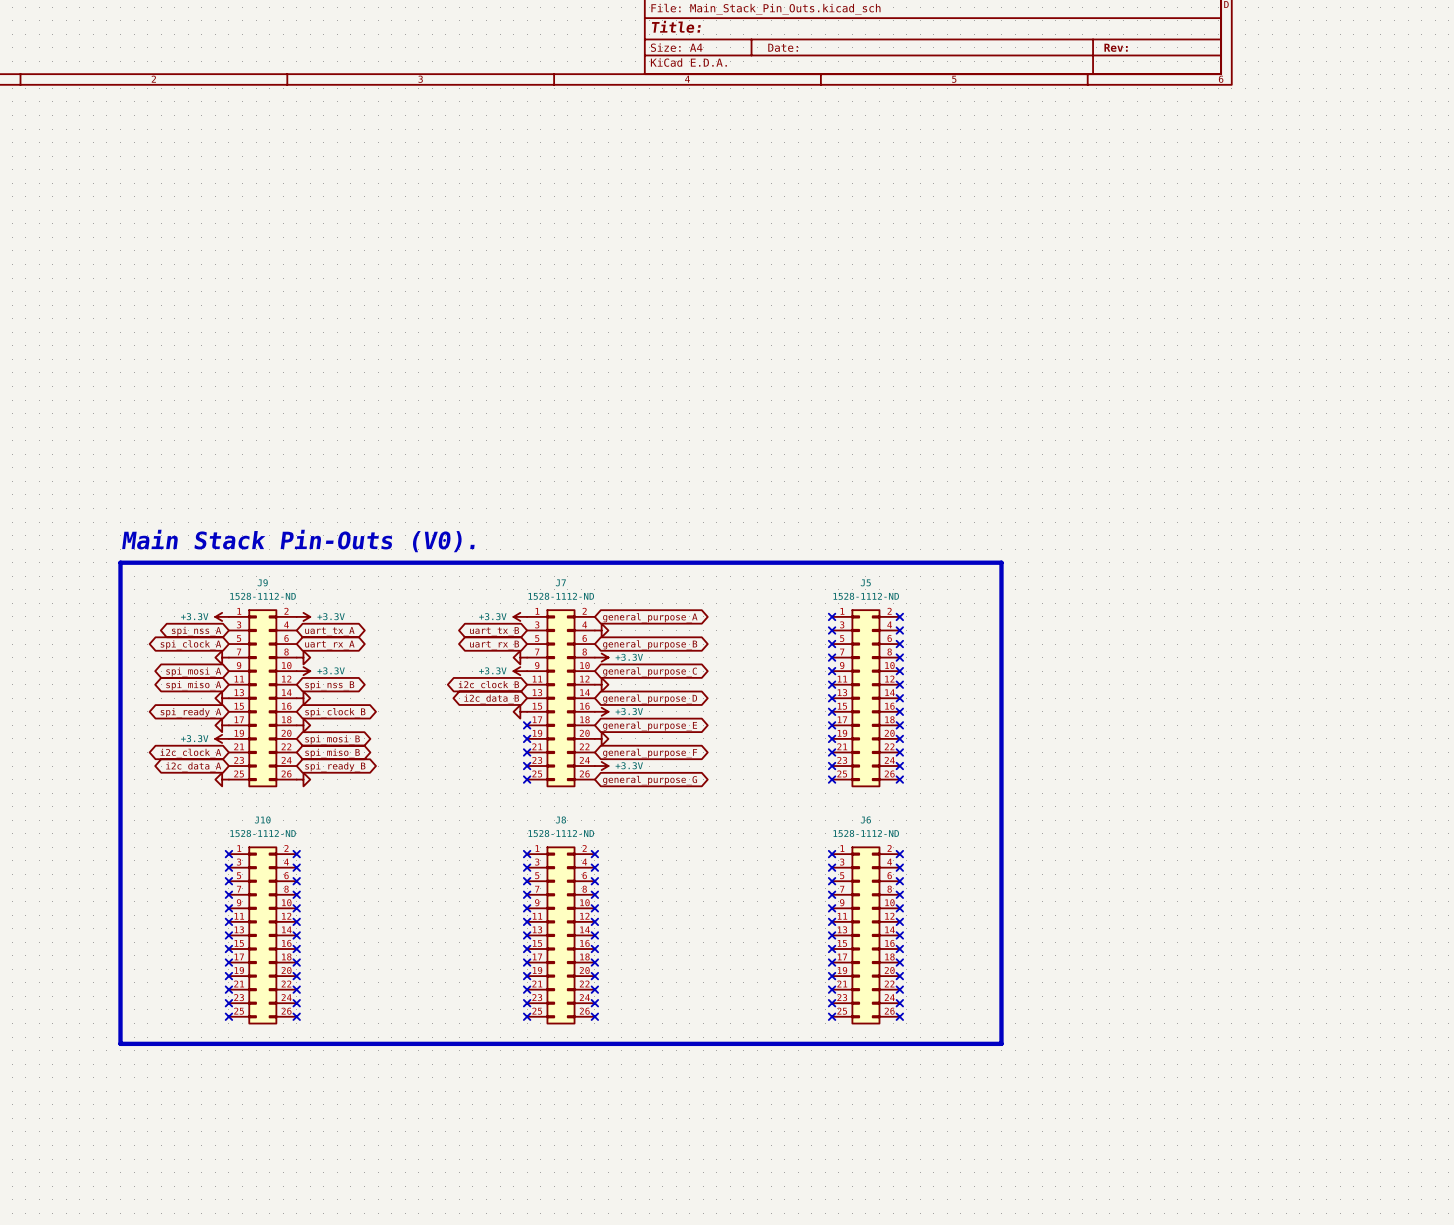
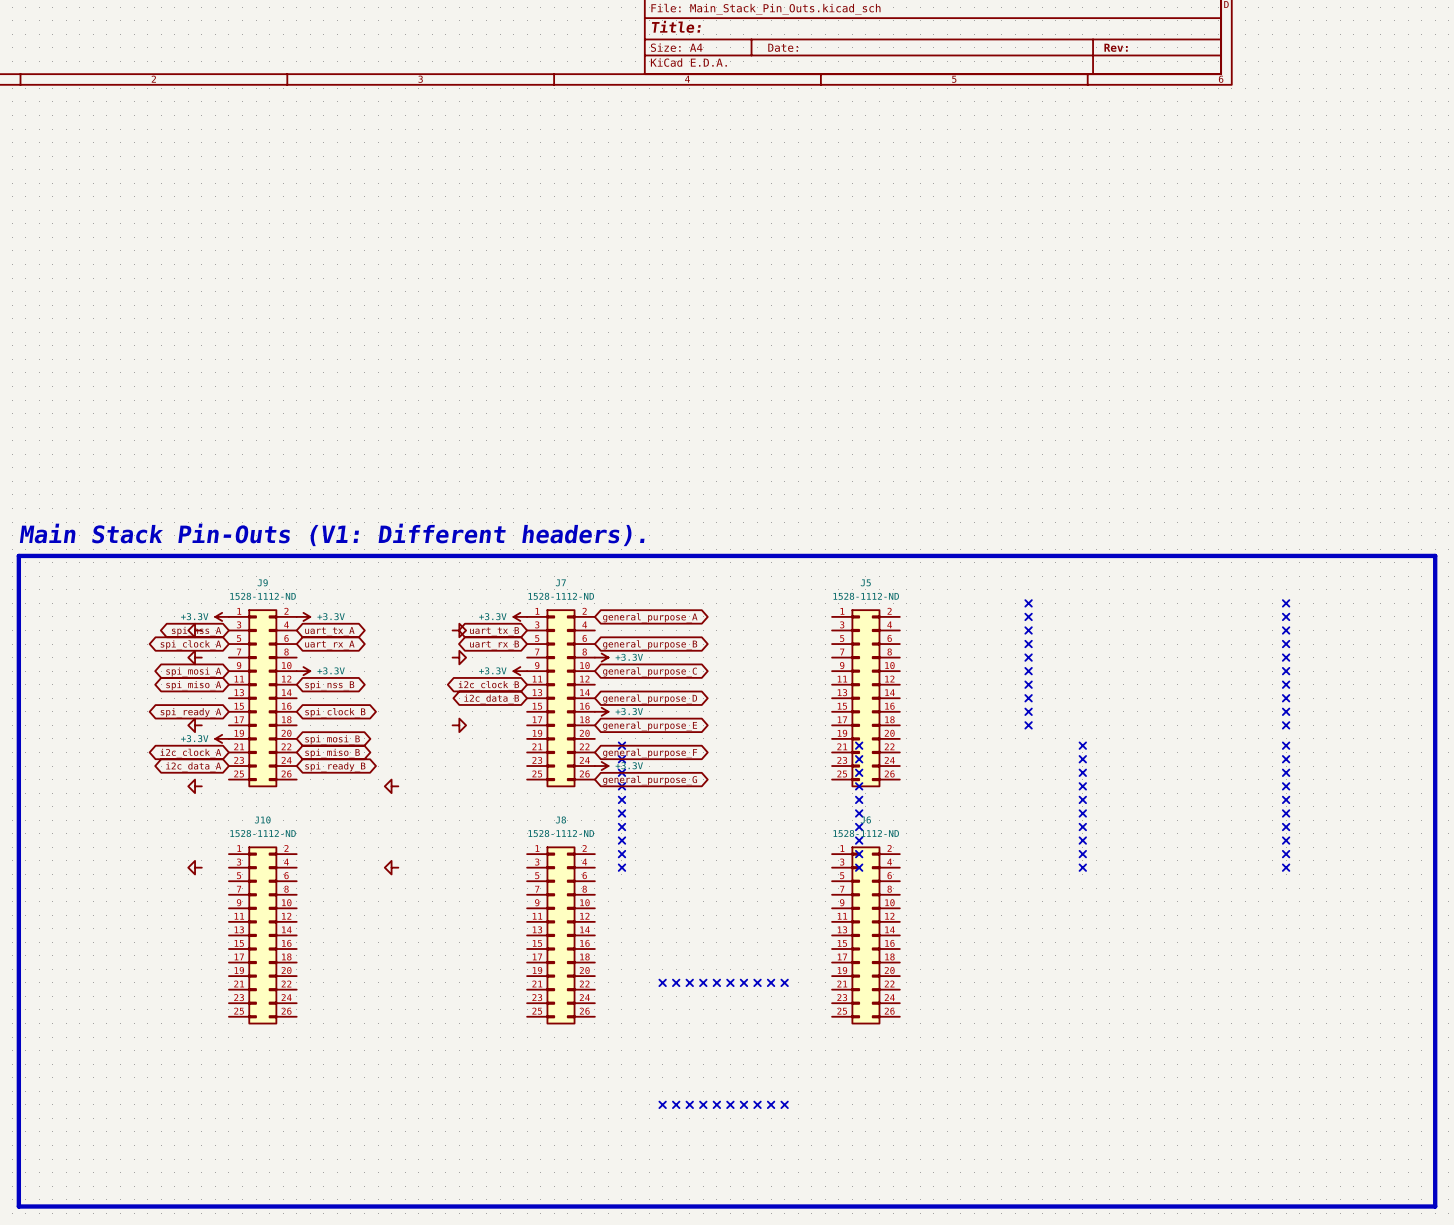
text: Main Stack Pin-Outs (V0). (298, 540) -> Main Stack Pin-Outs (V1: Different headers). (332, 534)
line: none -> (18, 555) (1435, 555) (1435, 1206) (18, 1206) (18, 555)
line: (120, 562) (1001, 562) (1001, 1043) (120, 1043) (120, 562) -> none
no-connect mark: none -> (1028, 603)
no-connect mark: none -> (1286, 603)
no-connect mark: (832, 616) -> none
no-connect mark: (899, 616) -> none
no-connect mark: none -> (1028, 616)
no-connect mark: none -> (1286, 616)
power symbol: none -> (195, 630)
power symbol: none -> (459, 630)
power symbol: (601, 630) -> none
no-connect mark: (832, 630) -> none
no-connect mark: (899, 630) -> none
no-connect mark: none -> (1028, 630)
no-connect mark: none -> (1286, 630)
no-connect mark: (832, 644) -> none
no-connect mark: (899, 644) -> none
no-connect mark: none -> (1028, 644)
no-connect mark: none -> (1286, 644)
power symbol: none -> (195, 657)
power symbol: (222, 657) -> none
power symbol: (303, 657) -> none
power symbol: none -> (459, 657)
power symbol: (520, 657) -> none
no-connect mark: (832, 657) -> none
no-connect mark: (899, 657) -> none
no-connect mark: none -> (1028, 657)
no-connect mark: none -> (1286, 657)
no-connect mark: (832, 671) -> none
no-connect mark: (899, 671) -> none
no-connect mark: none -> (1028, 671)
no-connect mark: none -> (1286, 671)
power symbol: (601, 684) -> none
no-connect mark: (832, 684) -> none
no-connect mark: (899, 684) -> none
no-connect mark: none -> (1028, 684)
no-connect mark: none -> (1286, 684)
power symbol: (222, 698) -> none
power symbol: (303, 698) -> none
no-connect mark: (832, 698) -> none
no-connect mark: (899, 698) -> none
no-connect mark: none -> (1028, 698)
no-connect mark: none -> (1286, 698)
power symbol: (520, 711) -> none
no-connect mark: (832, 711) -> none
no-connect mark: (899, 711) -> none
no-connect mark: none -> (1028, 711)
no-connect mark: none -> (1286, 711)
power symbol: none -> (195, 725)
power symbol: (222, 725) -> none
power symbol: (303, 725) -> none
power symbol: none -> (459, 725)
no-connect mark: (527, 725) -> none
no-connect mark: (832, 725) -> none
no-connect mark: (899, 725) -> none
no-connect mark: none -> (1028, 725)
no-connect mark: none -> (1286, 725)
no-connect mark: (527, 738) -> none
power symbol: (601, 738) -> none
no-connect mark: (832, 738) -> none
no-connect mark: (899, 738) -> none
no-connect mark: none -> (621, 745)
no-connect mark: none -> (859, 745)
no-connect mark: none -> (1082, 745)
no-connect mark: none -> (1286, 745)
no-connect mark: (527, 752) -> none
no-connect mark: (832, 752) -> none
no-connect mark: (899, 752) -> none
no-connect mark: none -> (621, 759)
no-connect mark: none -> (859, 759)
no-connect mark: none -> (1082, 759)
no-connect mark: none -> (1286, 759)
no-connect mark: (527, 766) -> none
no-connect mark: (832, 766) -> none
no-connect mark: (899, 766) -> none
no-connect mark: none -> (621, 772)
no-connect mark: none -> (859, 772)
no-connect mark: none -> (1082, 772)
no-connect mark: none -> (1286, 772)
power symbol position: (222, 779) -> (195, 786)
power symbol: (303, 779) -> none
no-connect mark: (527, 779) -> none
no-connect mark: (832, 779) -> none
no-connect mark: (899, 779) -> none
power symbol: none -> (391, 786)
no-connect mark: none -> (621, 786)
no-connect mark: none -> (859, 786)
no-connect mark: none -> (1082, 786)
no-connect mark: none -> (1286, 786)
no-connect mark: none -> (621, 799)
no-connect mark: none -> (859, 799)
no-connect mark: none -> (1082, 799)
no-connect mark: none -> (1286, 799)
no-connect mark: none -> (621, 813)
no-connect mark: none -> (859, 813)
no-connect mark: none -> (1082, 813)
no-connect mark: none -> (1286, 813)
no-connect mark: none -> (621, 827)
no-connect mark: none -> (859, 827)
no-connect mark: none -> (1082, 827)
no-connect mark: none -> (1286, 827)
no-connect mark: none -> (621, 840)
no-connect mark: none -> (859, 840)
no-connect mark: none -> (1082, 840)
no-connect mark: none -> (1286, 840)
no-connect mark: (228, 854) -> none
no-connect mark: (296, 854) -> none
no-connect mark: (527, 854) -> none
no-connect mark: (594, 854) -> none
no-connect mark: none -> (621, 854)
no-connect mark: (832, 854) -> none
no-connect mark: none -> (859, 854)
no-connect mark: (899, 854) -> none
no-connect mark: none -> (1082, 854)
no-connect mark: none -> (1286, 854)
power symbol: none -> (195, 867)
no-connect mark: (228, 867) -> none
no-connect mark: (296, 867) -> none
power symbol: none -> (391, 867)
no-connect mark: (527, 867) -> none
no-connect mark: (594, 867) -> none
no-connect mark: none -> (621, 867)
no-connect mark: (832, 867) -> none
no-connect mark: none -> (859, 867)
no-connect mark: (899, 867) -> none
no-connect mark: none -> (1082, 867)
no-connect mark: none -> (1286, 867)
no-connect mark: (228, 881) -> none
no-connect mark: (296, 881) -> none
no-connect mark: (527, 881) -> none
no-connect mark: (594, 881) -> none
no-connect mark: (832, 881) -> none
no-connect mark: (899, 881) -> none
no-connect mark: (228, 894) -> none
no-connect mark: (296, 894) -> none
no-connect mark: (527, 894) -> none
no-connect mark: (594, 894) -> none
no-connect mark: (832, 894) -> none
no-connect mark: (899, 894) -> none
no-connect mark: (228, 908) -> none
no-connect mark: (296, 908) -> none
no-connect mark: (527, 908) -> none
no-connect mark: (594, 908) -> none
no-connect mark: (832, 908) -> none
no-connect mark: (899, 908) -> none
no-connect mark: (228, 921) -> none
no-connect mark: (296, 921) -> none
no-connect mark: (527, 921) -> none
no-connect mark: (594, 921) -> none
no-connect mark: (832, 921) -> none
no-connect mark: (899, 921) -> none
no-connect mark: (228, 935) -> none
no-connect mark: (296, 935) -> none
no-connect mark: (527, 935) -> none
no-connect mark: (594, 935) -> none
no-connect mark: (832, 935) -> none
no-connect mark: (899, 935) -> none
no-connect mark: (228, 948) -> none
no-connect mark: (296, 948) -> none
no-connect mark: (527, 948) -> none
no-connect mark: (594, 948) -> none
no-connect mark: (832, 948) -> none
no-connect mark: (899, 948) -> none
no-connect mark: (228, 962) -> none
no-connect mark: (296, 962) -> none
no-connect mark: (527, 962) -> none
no-connect mark: (594, 962) -> none
no-connect mark: (832, 962) -> none
no-connect mark: (899, 962) -> none
no-connect mark: (228, 976) -> none
no-connect mark: (296, 976) -> none
no-connect mark: (527, 976) -> none
no-connect mark: (594, 976) -> none
no-connect mark: (832, 976) -> none
no-connect mark: (899, 976) -> none
no-connect mark: none -> (662, 982)
no-connect mark: none -> (676, 982)
no-connect mark: none -> (689, 982)
no-connect mark: none -> (703, 982)
no-connect mark: none -> (716, 982)
no-connect mark: none -> (730, 982)
no-connect mark: none -> (743, 982)
no-connect mark: none -> (757, 982)
no-connect mark: none -> (771, 982)
no-connect mark: none -> (784, 982)
no-connect mark: (228, 989) -> none
no-connect mark: (296, 989) -> none
no-connect mark: (527, 989) -> none
no-connect mark: (594, 989) -> none
no-connect mark: (832, 989) -> none
no-connect mark: (899, 989) -> none
no-connect mark: (228, 1003) -> none
no-connect mark: (296, 1003) -> none
no-connect mark: (527, 1003) -> none
no-connect mark: (594, 1003) -> none
no-connect mark: (832, 1003) -> none
no-connect mark: (899, 1003) -> none
no-connect mark: (228, 1016) -> none
no-connect mark: (296, 1016) -> none
no-connect mark: (527, 1016) -> none
no-connect mark: (594, 1016) -> none
no-connect mark: (832, 1016) -> none
no-connect mark: (899, 1016) -> none
no-connect mark: none -> (662, 1104)
no-connect mark: none -> (676, 1104)
no-connect mark: none -> (689, 1104)
no-connect mark: none -> (703, 1104)
no-connect mark: none -> (716, 1104)
no-connect mark: none -> (730, 1104)
no-connect mark: none -> (743, 1104)
no-connect mark: none -> (757, 1104)
no-connect mark: none -> (771, 1104)
no-connect mark: none -> (784, 1104)

